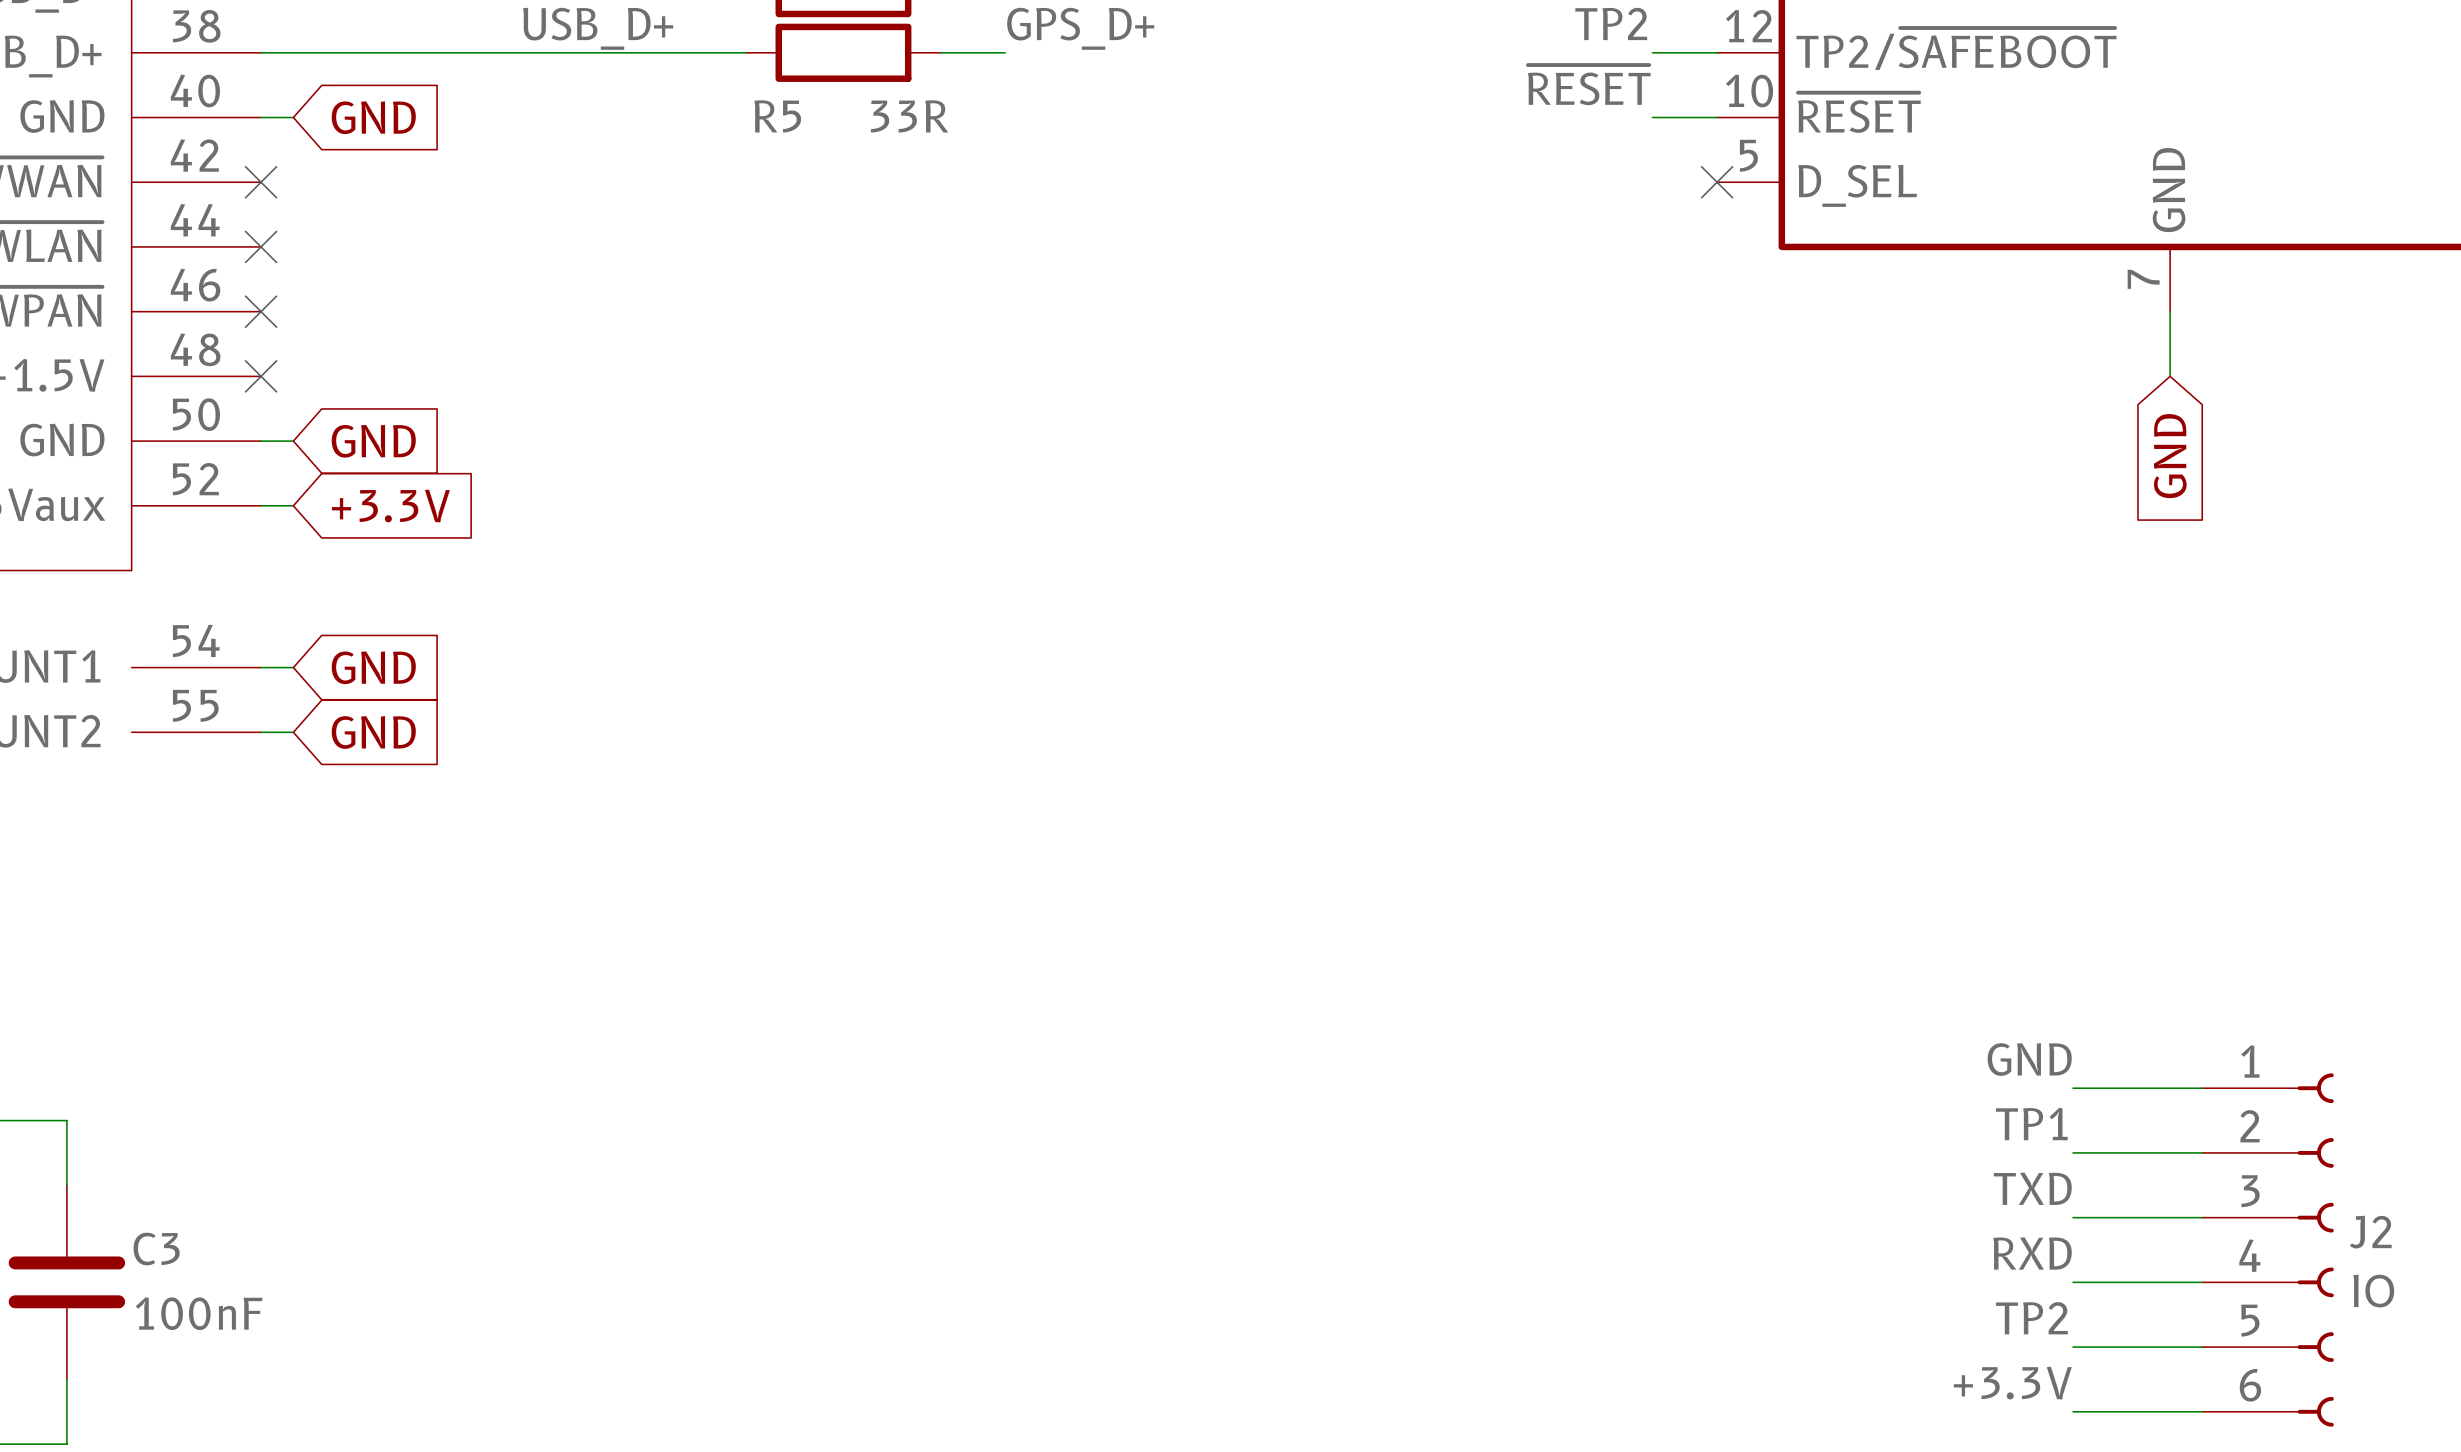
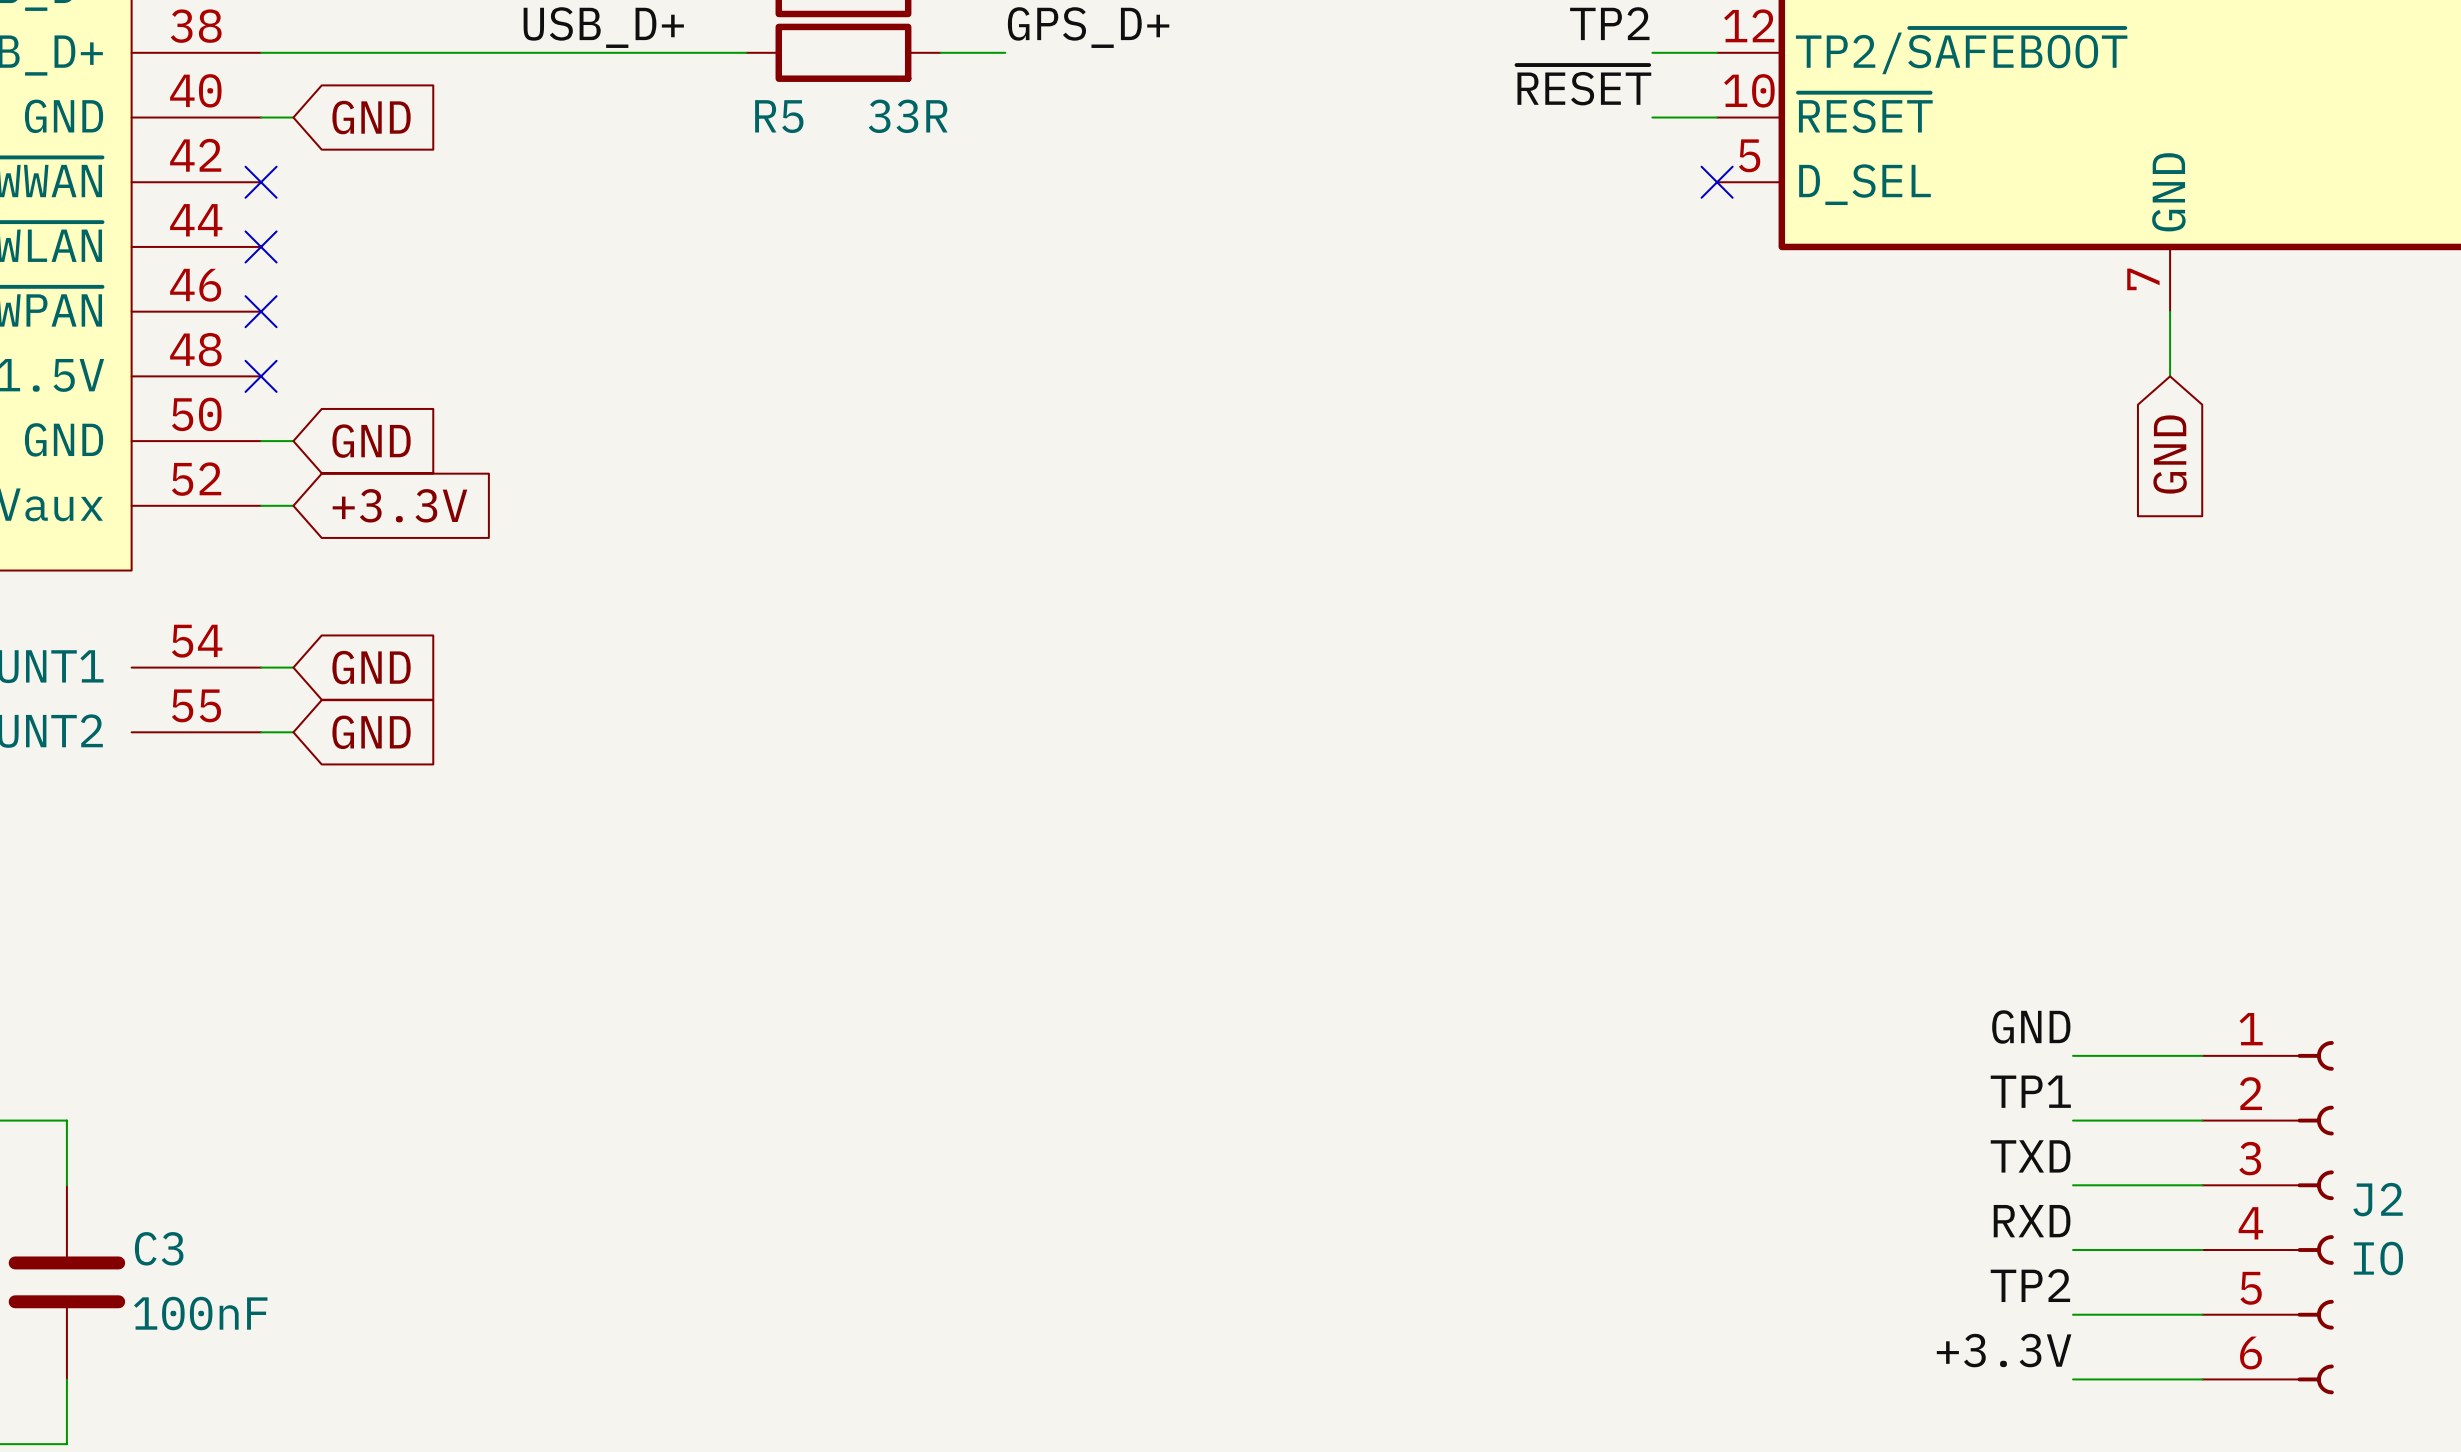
label position: GND (2029, 1059) -> GND (2031, 1026)
wire: (2073, 1088) (2202, 1088) -> (2073, 1055) (2202, 1055)
label position: TP1 (2031, 1124) -> TP1 (2030, 1091)
wire: (2073, 1152) (2202, 1152) -> (2073, 1120) (2202, 1120)
label position: TXD (2032, 1188) -> TXD (2030, 1156)
wire: (2073, 1217) (2202, 1217) -> (2073, 1185) (2202, 1185)
J2 position: (2268, 1250) -> (2268, 1217)
label position: RXD (2032, 1253) -> RXD (2032, 1221)
wire: (2073, 1282) (2202, 1282) -> (2073, 1250) (2202, 1250)
label position: TP2 (2031, 1318) -> TP2 (2030, 1285)
wire: (2073, 1347) (2202, 1347) -> (2073, 1314) (2202, 1314)
label position: +3.3V (2012, 1383) -> +3.3V (2004, 1350)
wire: (2073, 1411) (2202, 1411) -> (2073, 1379) (2202, 1379)

